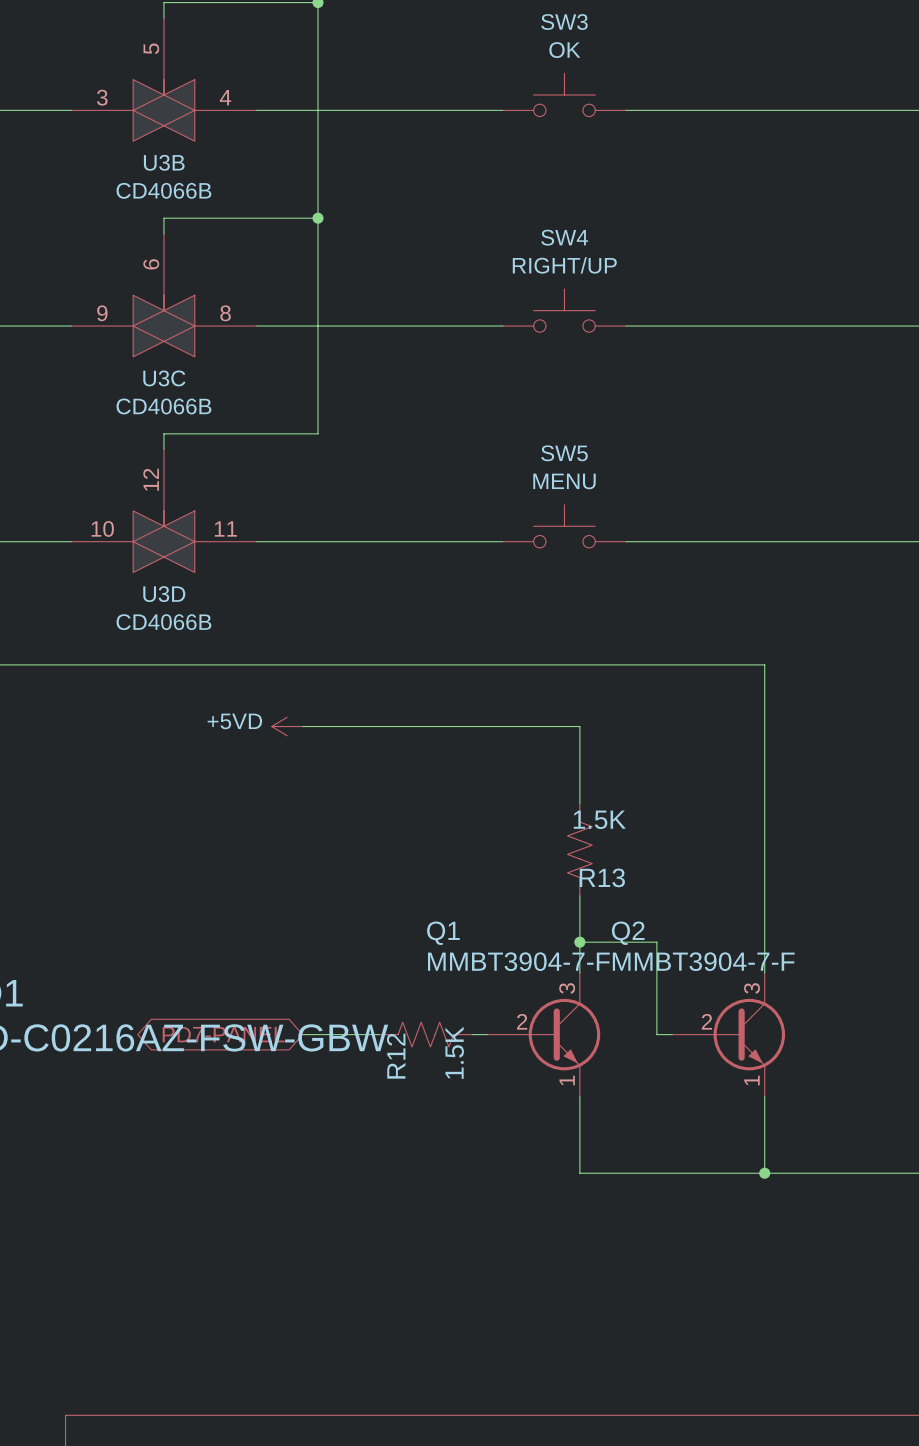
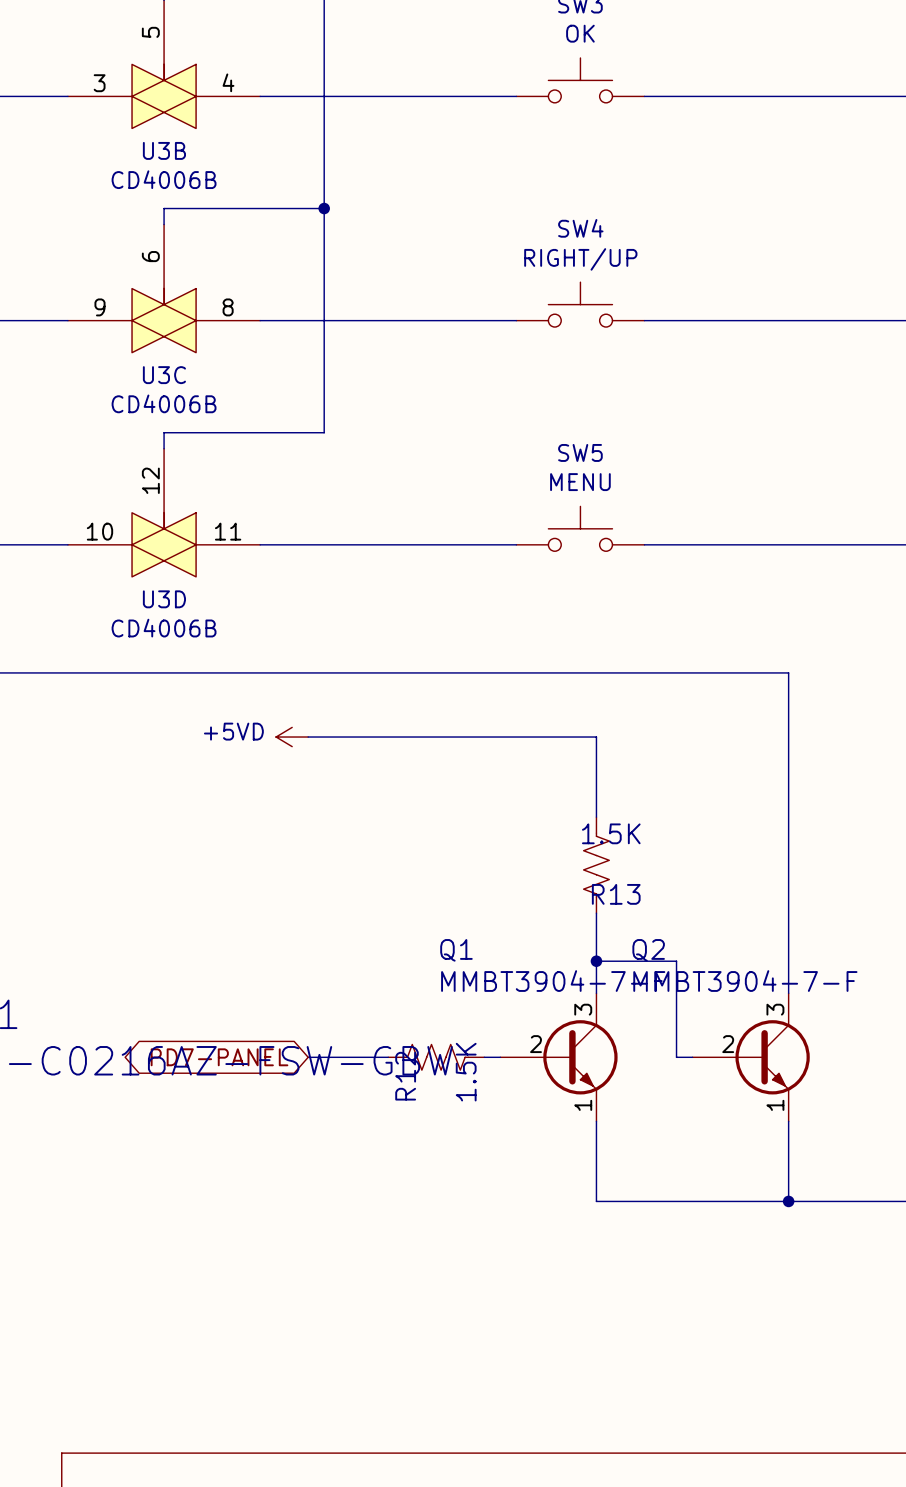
U3B value: CD4066B (163, 190) -> CD4006B (164, 179)
U3C value: CD4066B (163, 406) -> CD4006B (164, 403)
U3D value: CD4066B (163, 622) -> CD4006B (164, 628)

